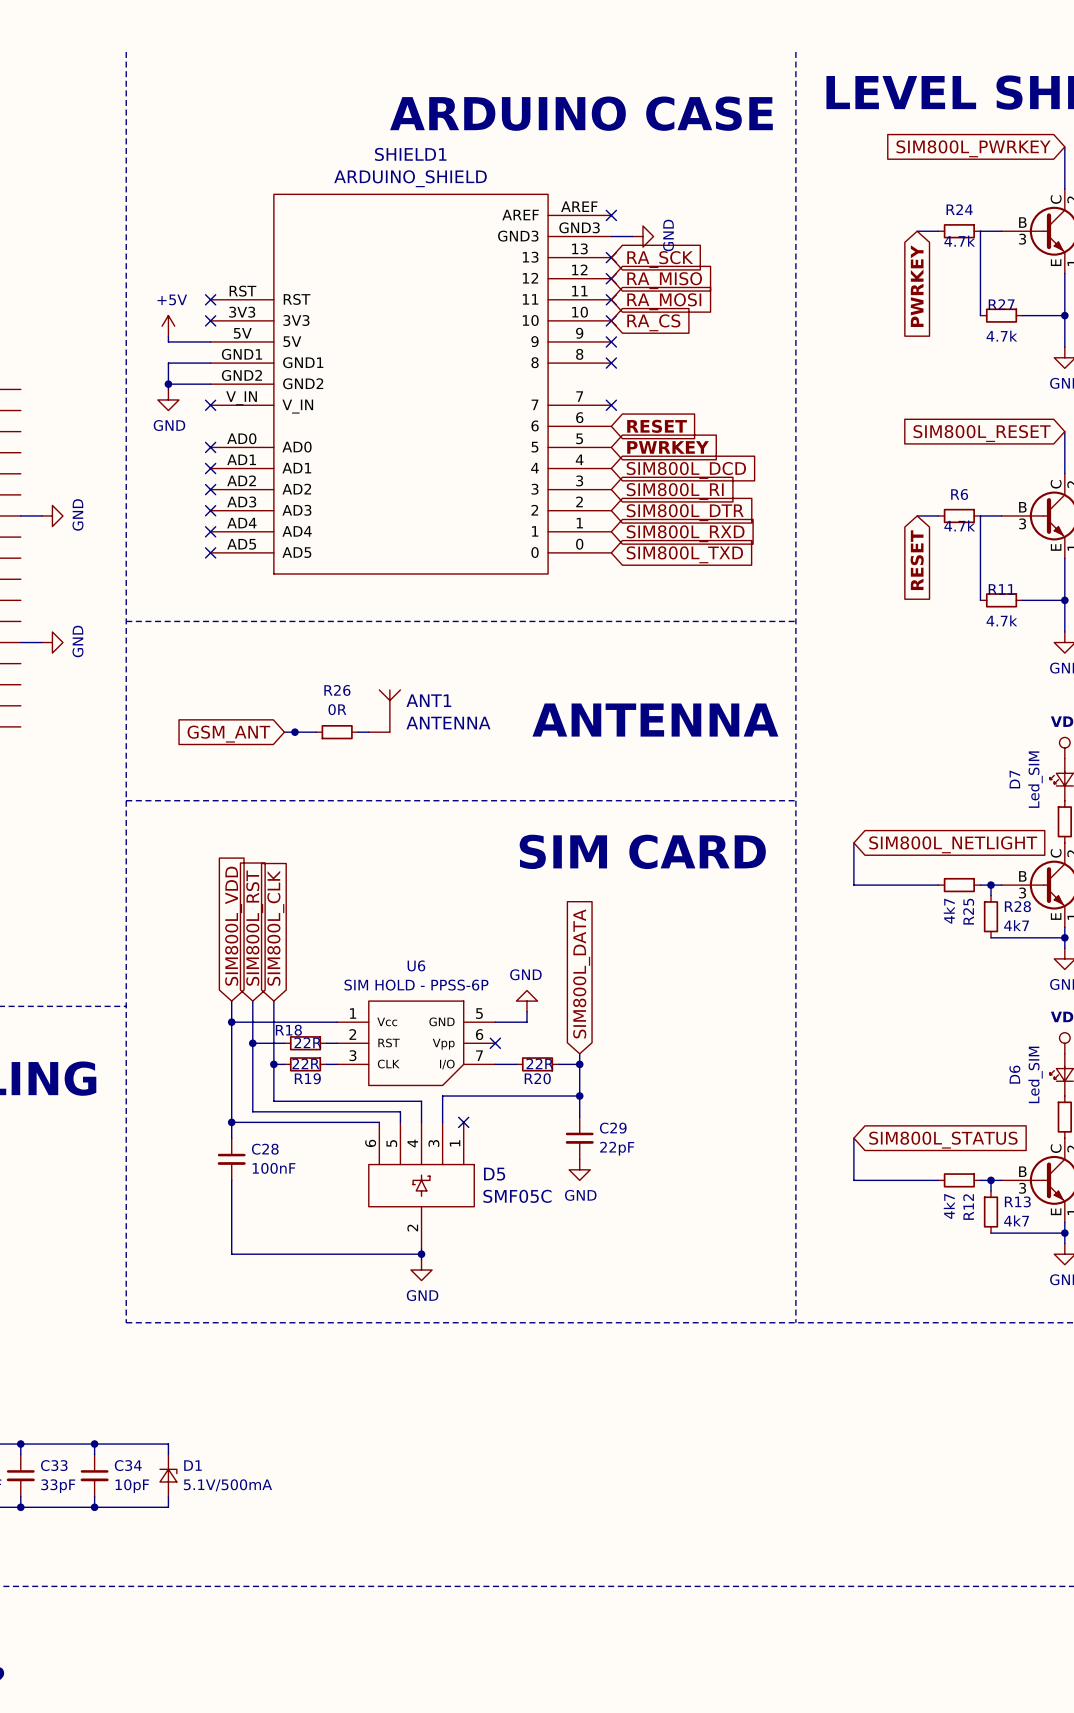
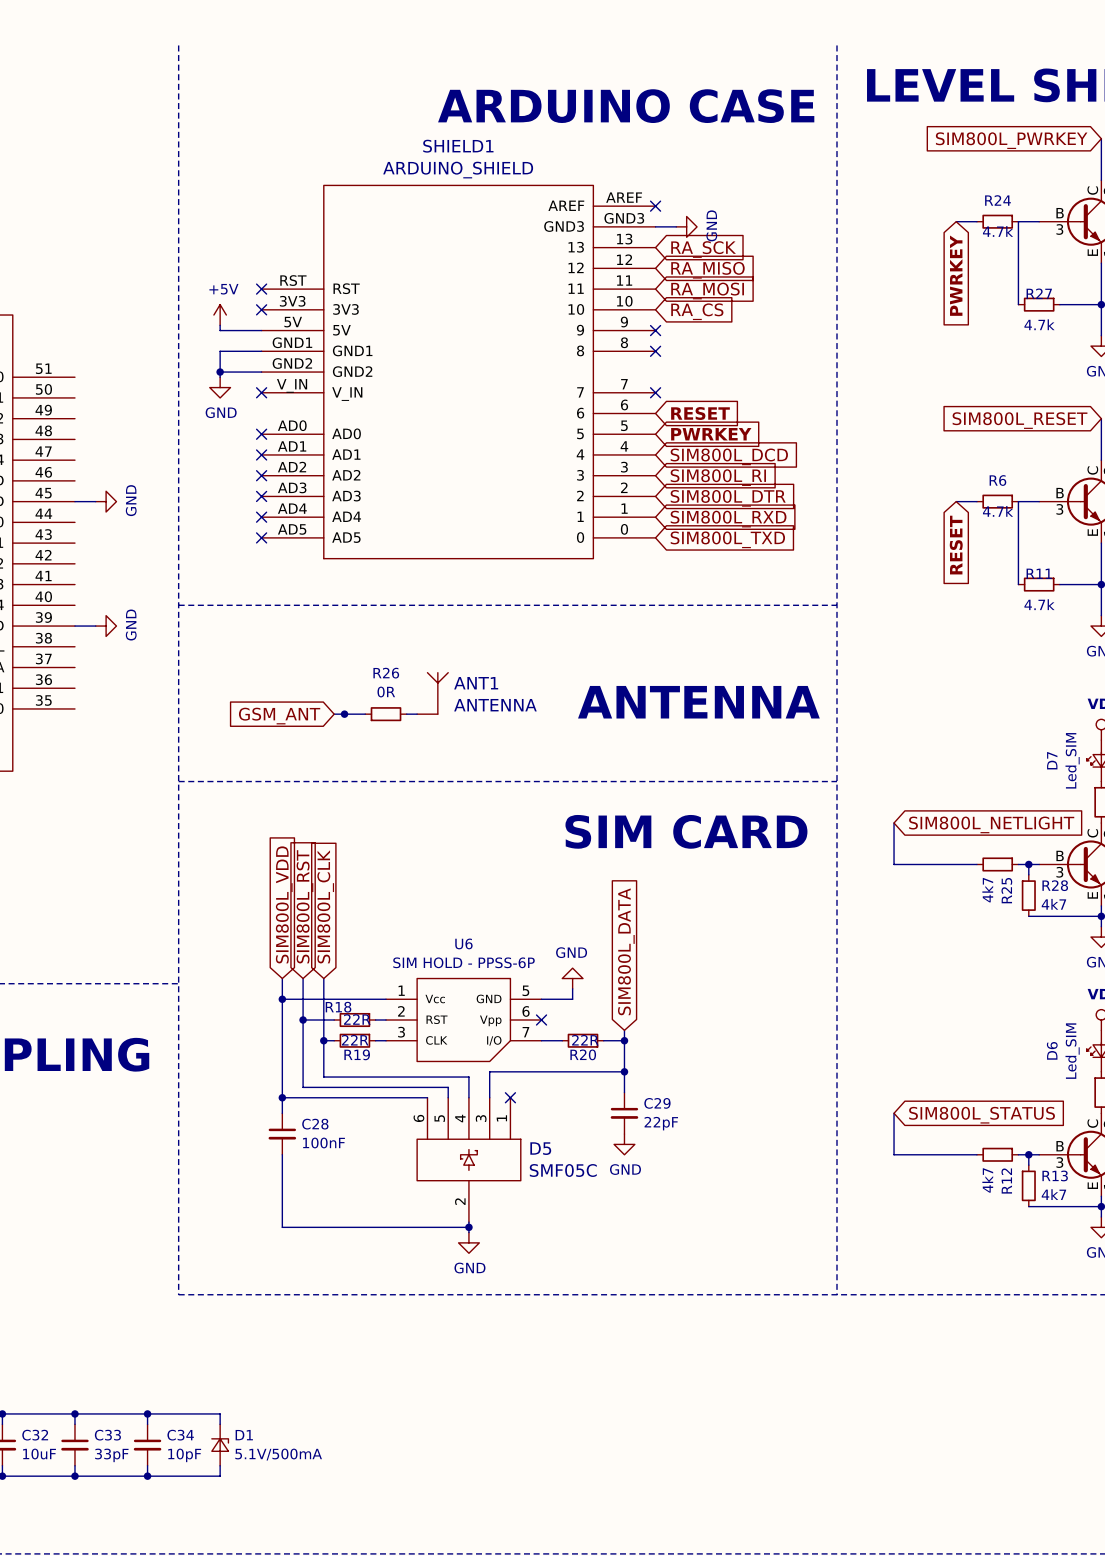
no-connect mark: (611, 257) -> none
no-connect mark: (611, 278) -> none
no-connect mark: (611, 299) -> none
no-connect mark: (611, 320) -> none

